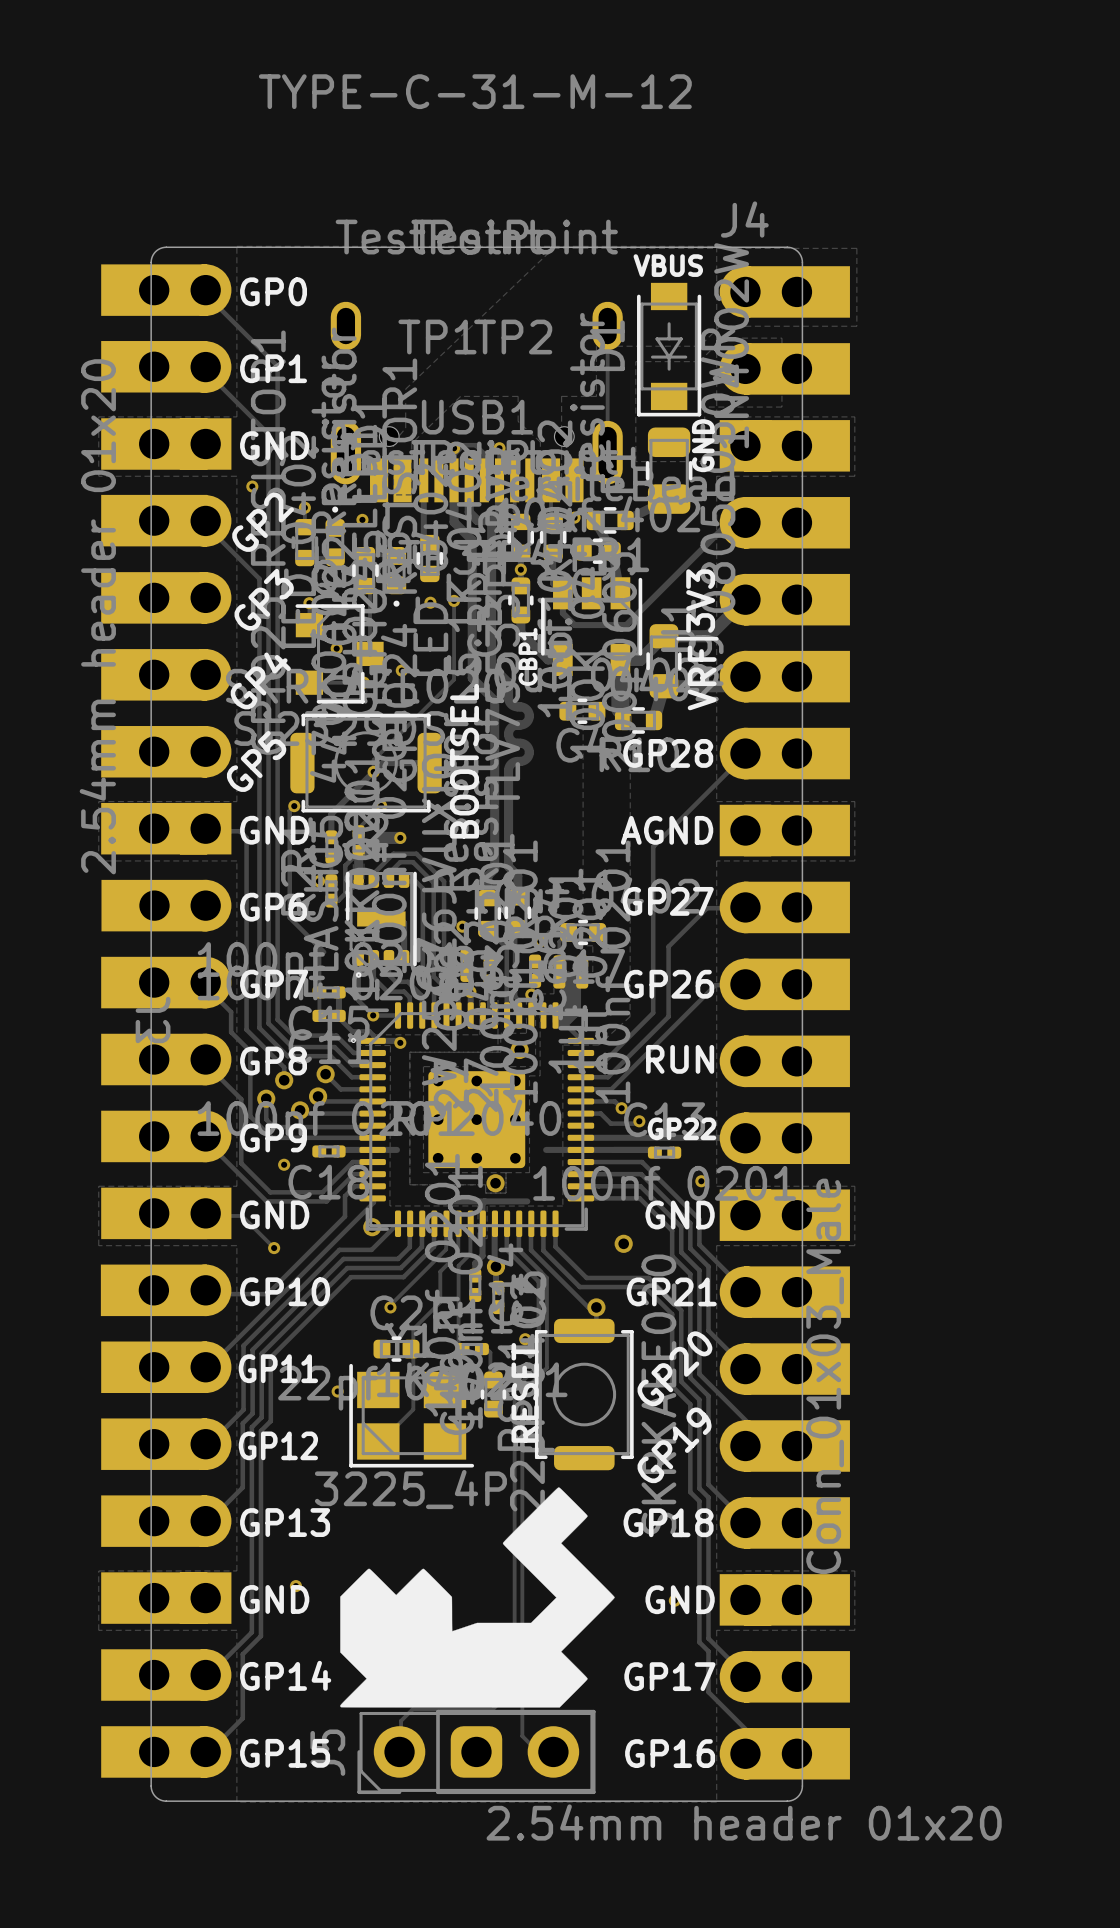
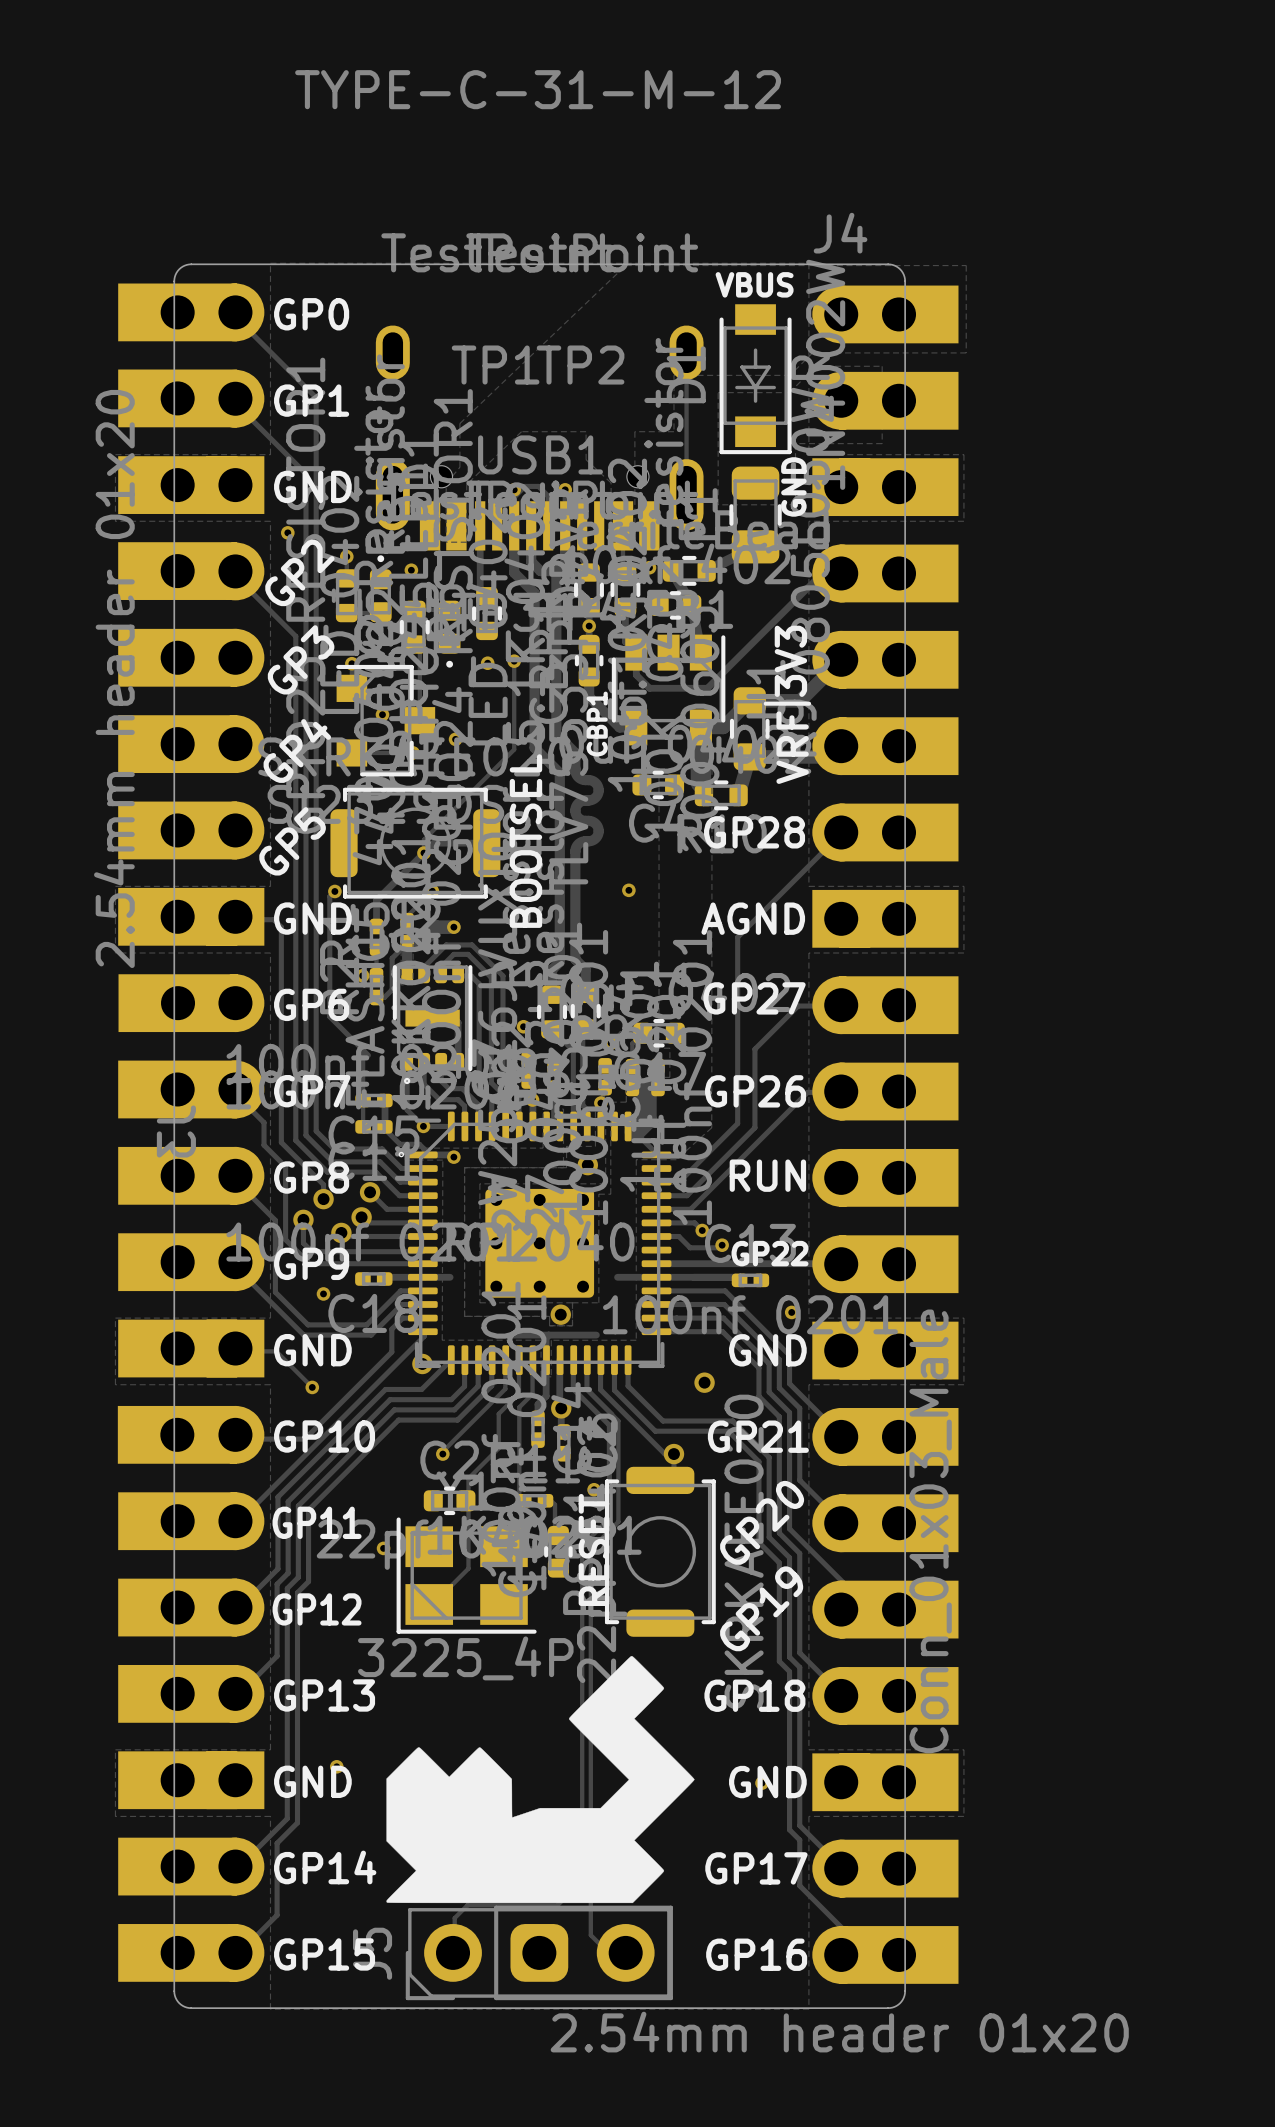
via: none -> (628, 890)

